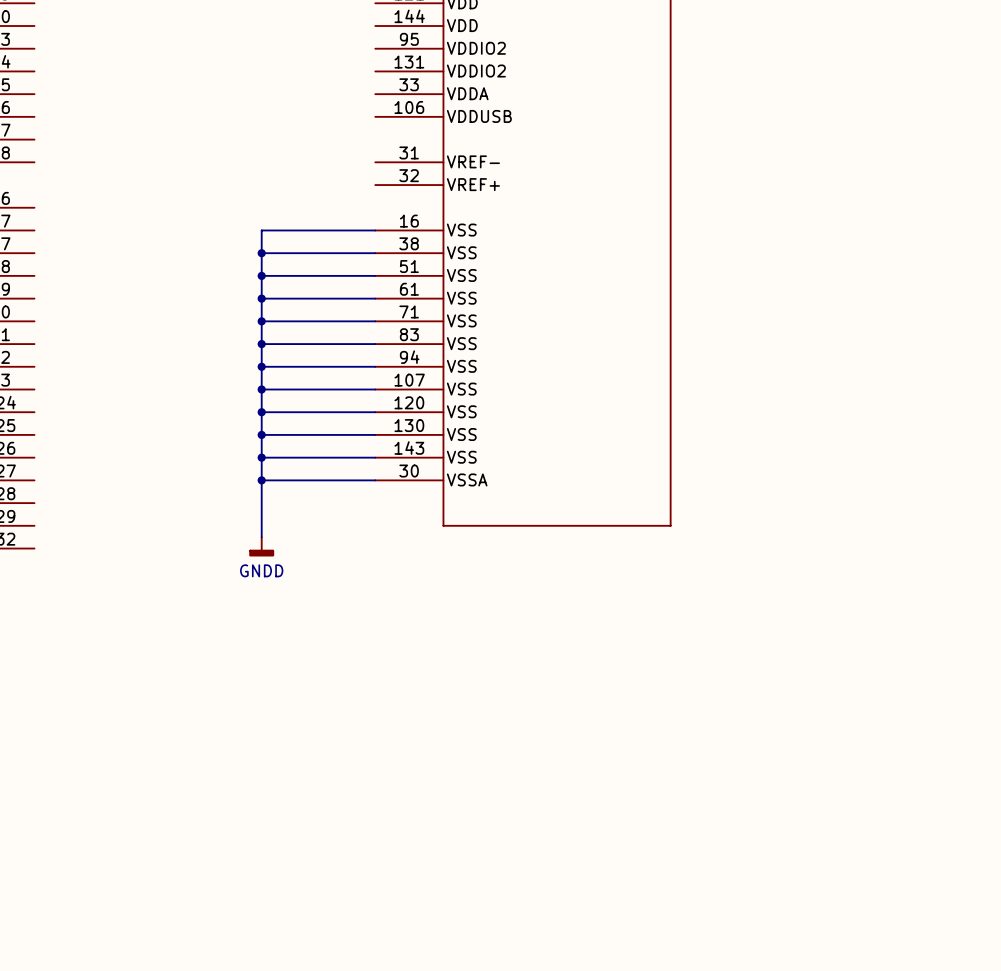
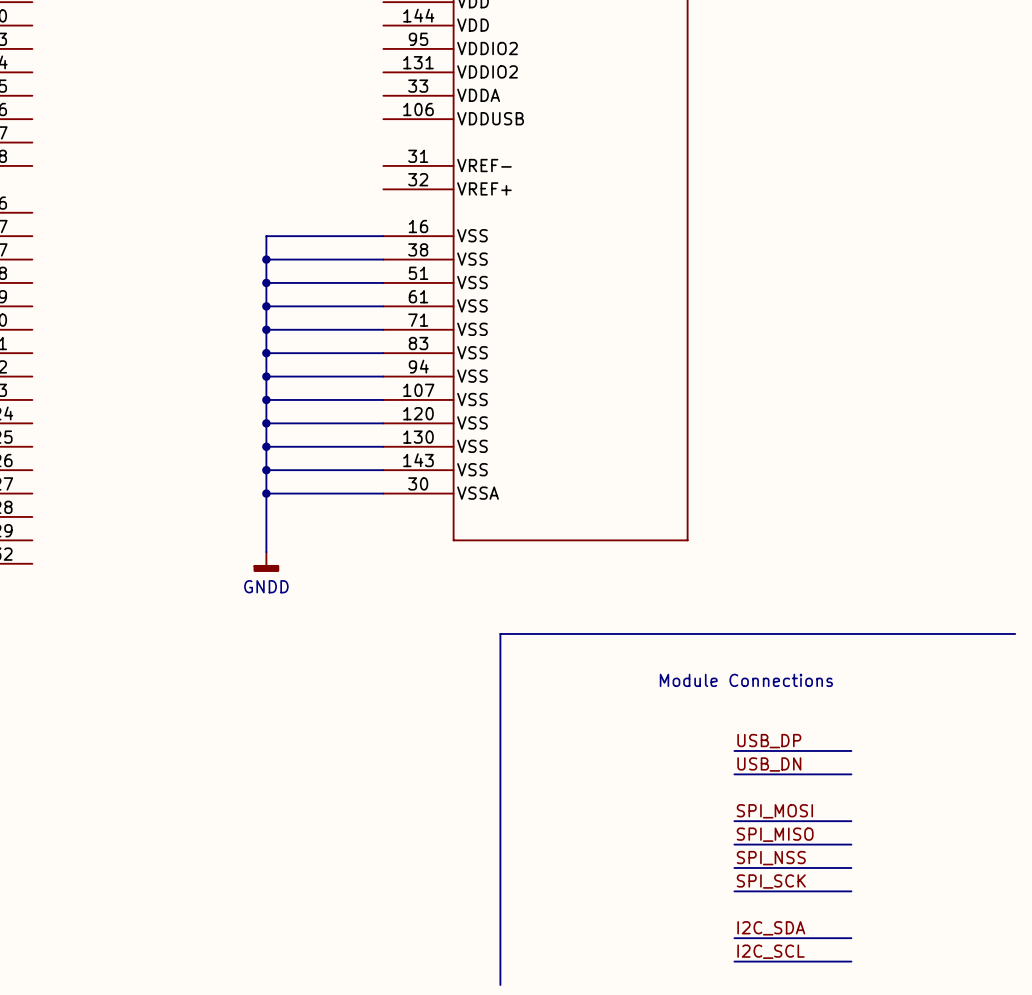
line: none -> (1015, 633) (500, 633) (500, 984)
text: none -> Module Connections (746, 680)
label: none -> USB_DP (769, 741)
wire: none -> (734, 750) (851, 750)
label: none -> USB_DN (769, 764)
wire: none -> (734, 774) (851, 774)
label: none -> SPI_MOSI (774, 811)
wire: none -> (734, 821) (851, 821)
label: none -> SPI_MISO (775, 834)
wire: none -> (734, 844) (851, 844)
label: none -> SPI_NSS (771, 858)
wire: none -> (734, 867) (851, 867)
label: none -> SPI_SCK (771, 881)
wire: none -> (734, 891) (851, 891)
label: none -> I2C_SDA (771, 928)
wire: none -> (734, 938) (851, 938)
label: none -> I2C_SCL (770, 951)
wire: none -> (734, 961) (851, 961)

